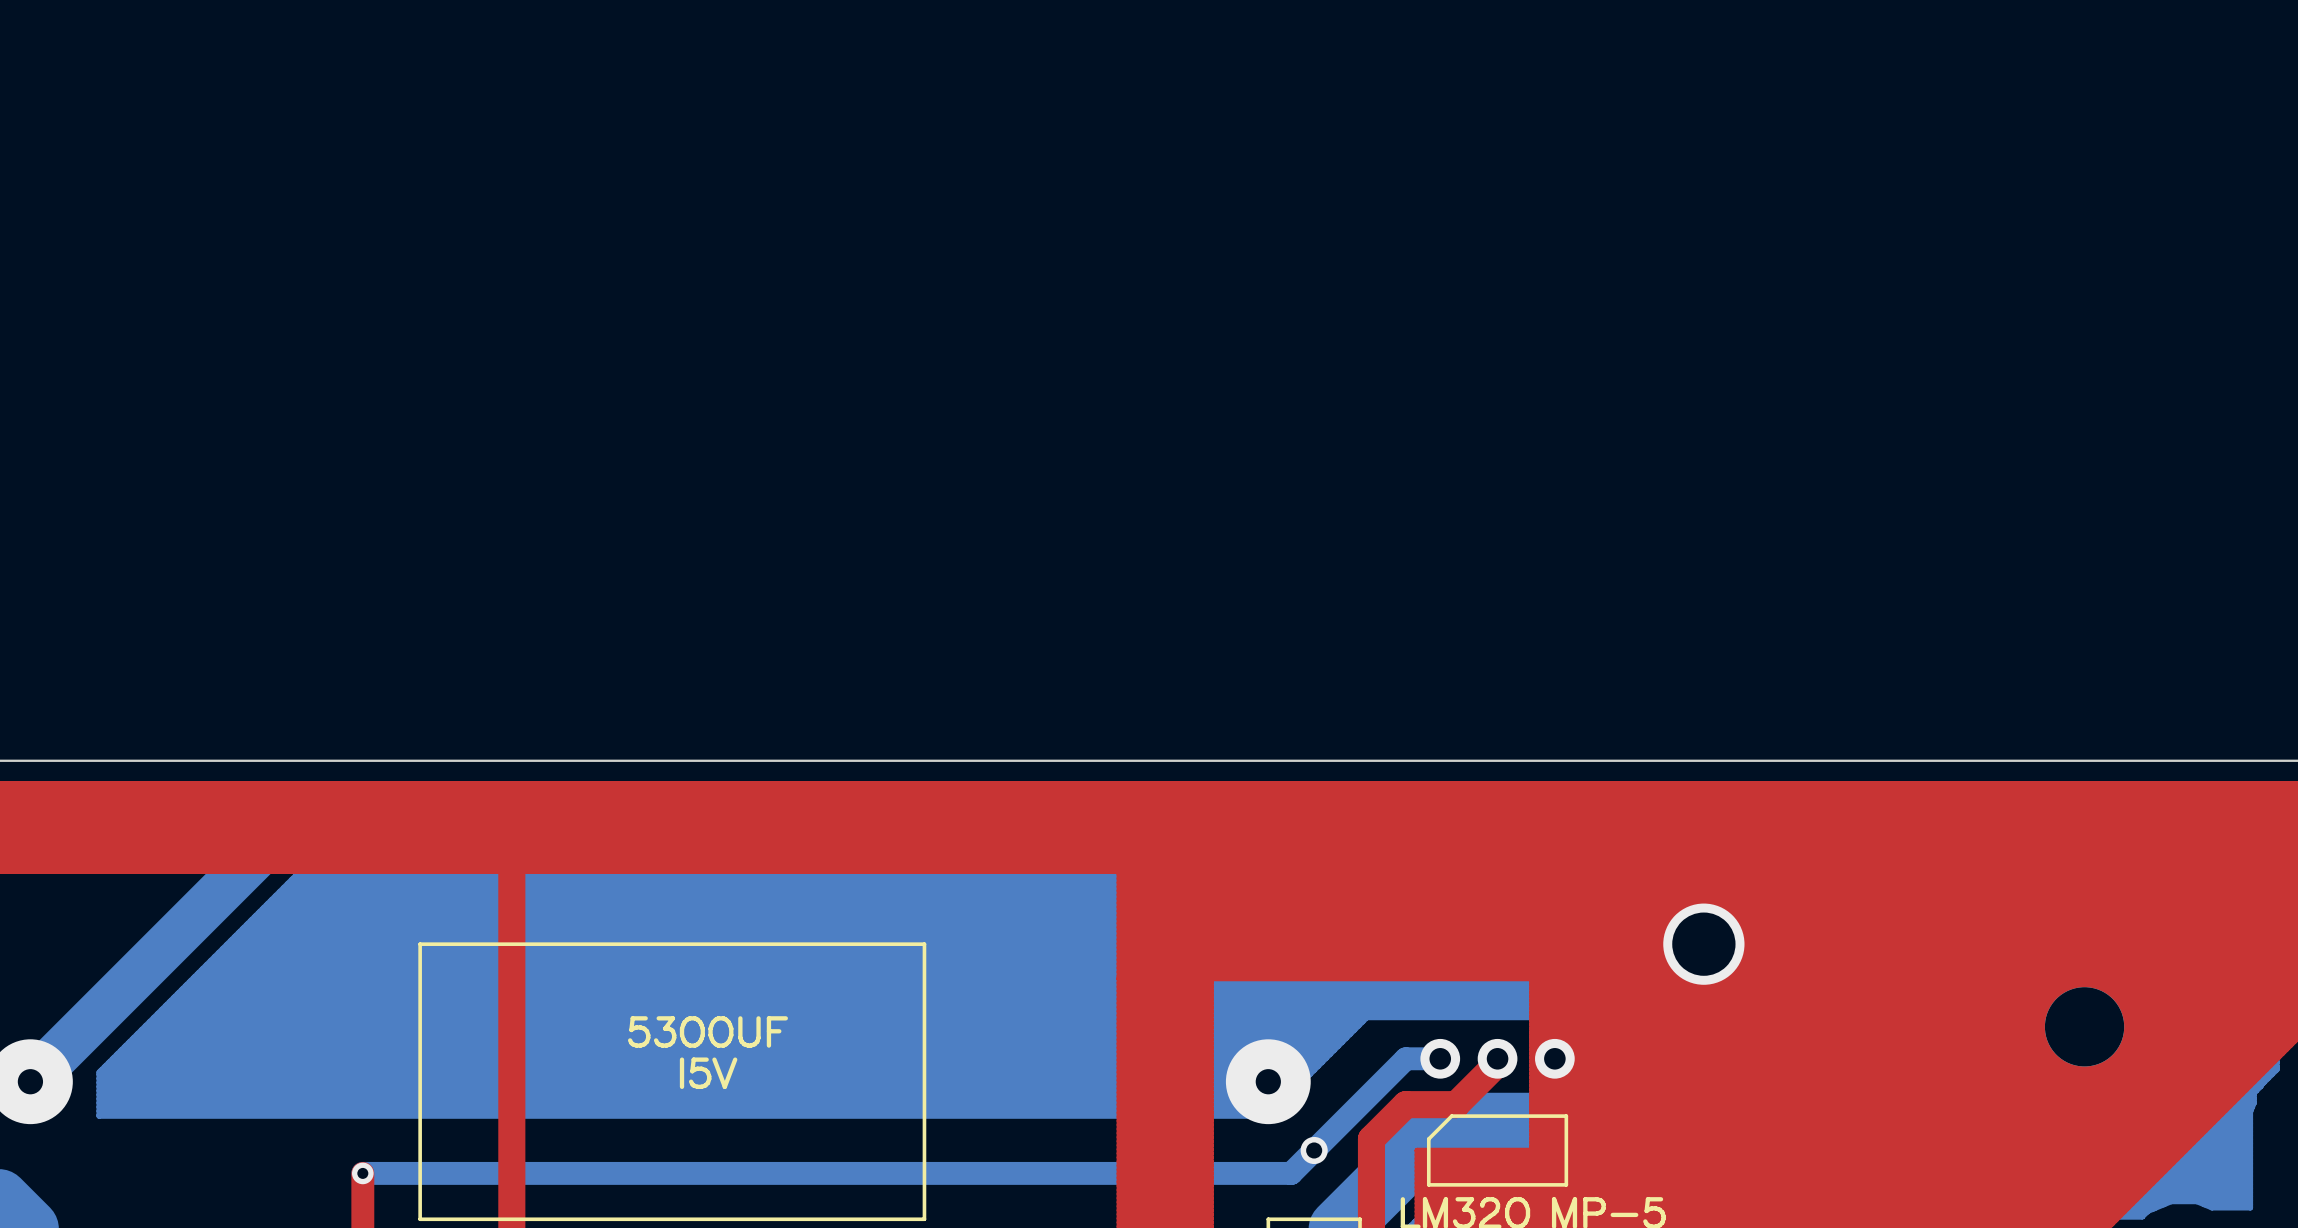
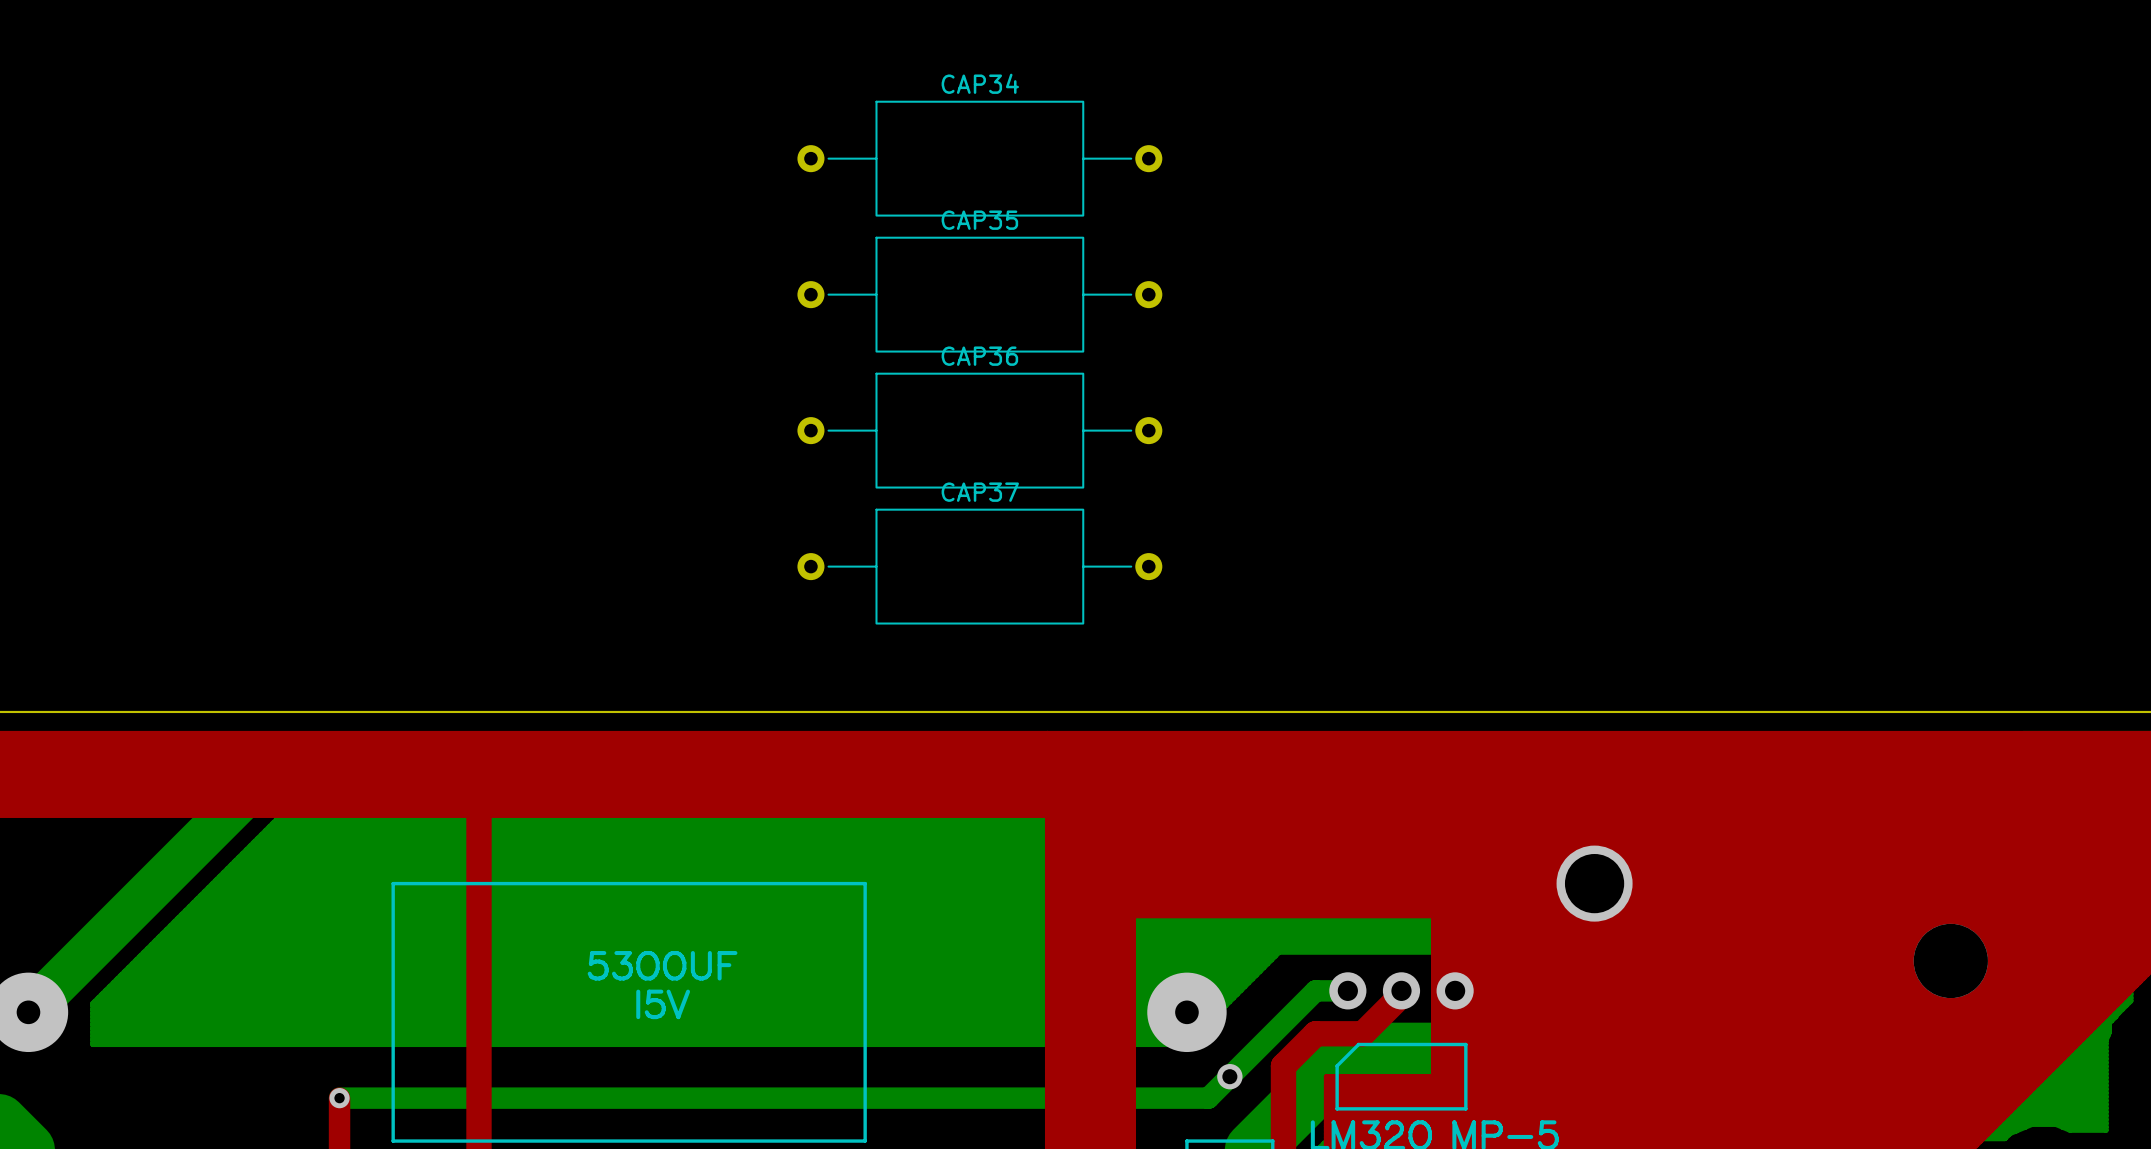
CAP34: none -> (979, 158)
CAP35: none -> (979, 294)
CAP36: none -> (979, 430)
CAP37: none -> (979, 566)

